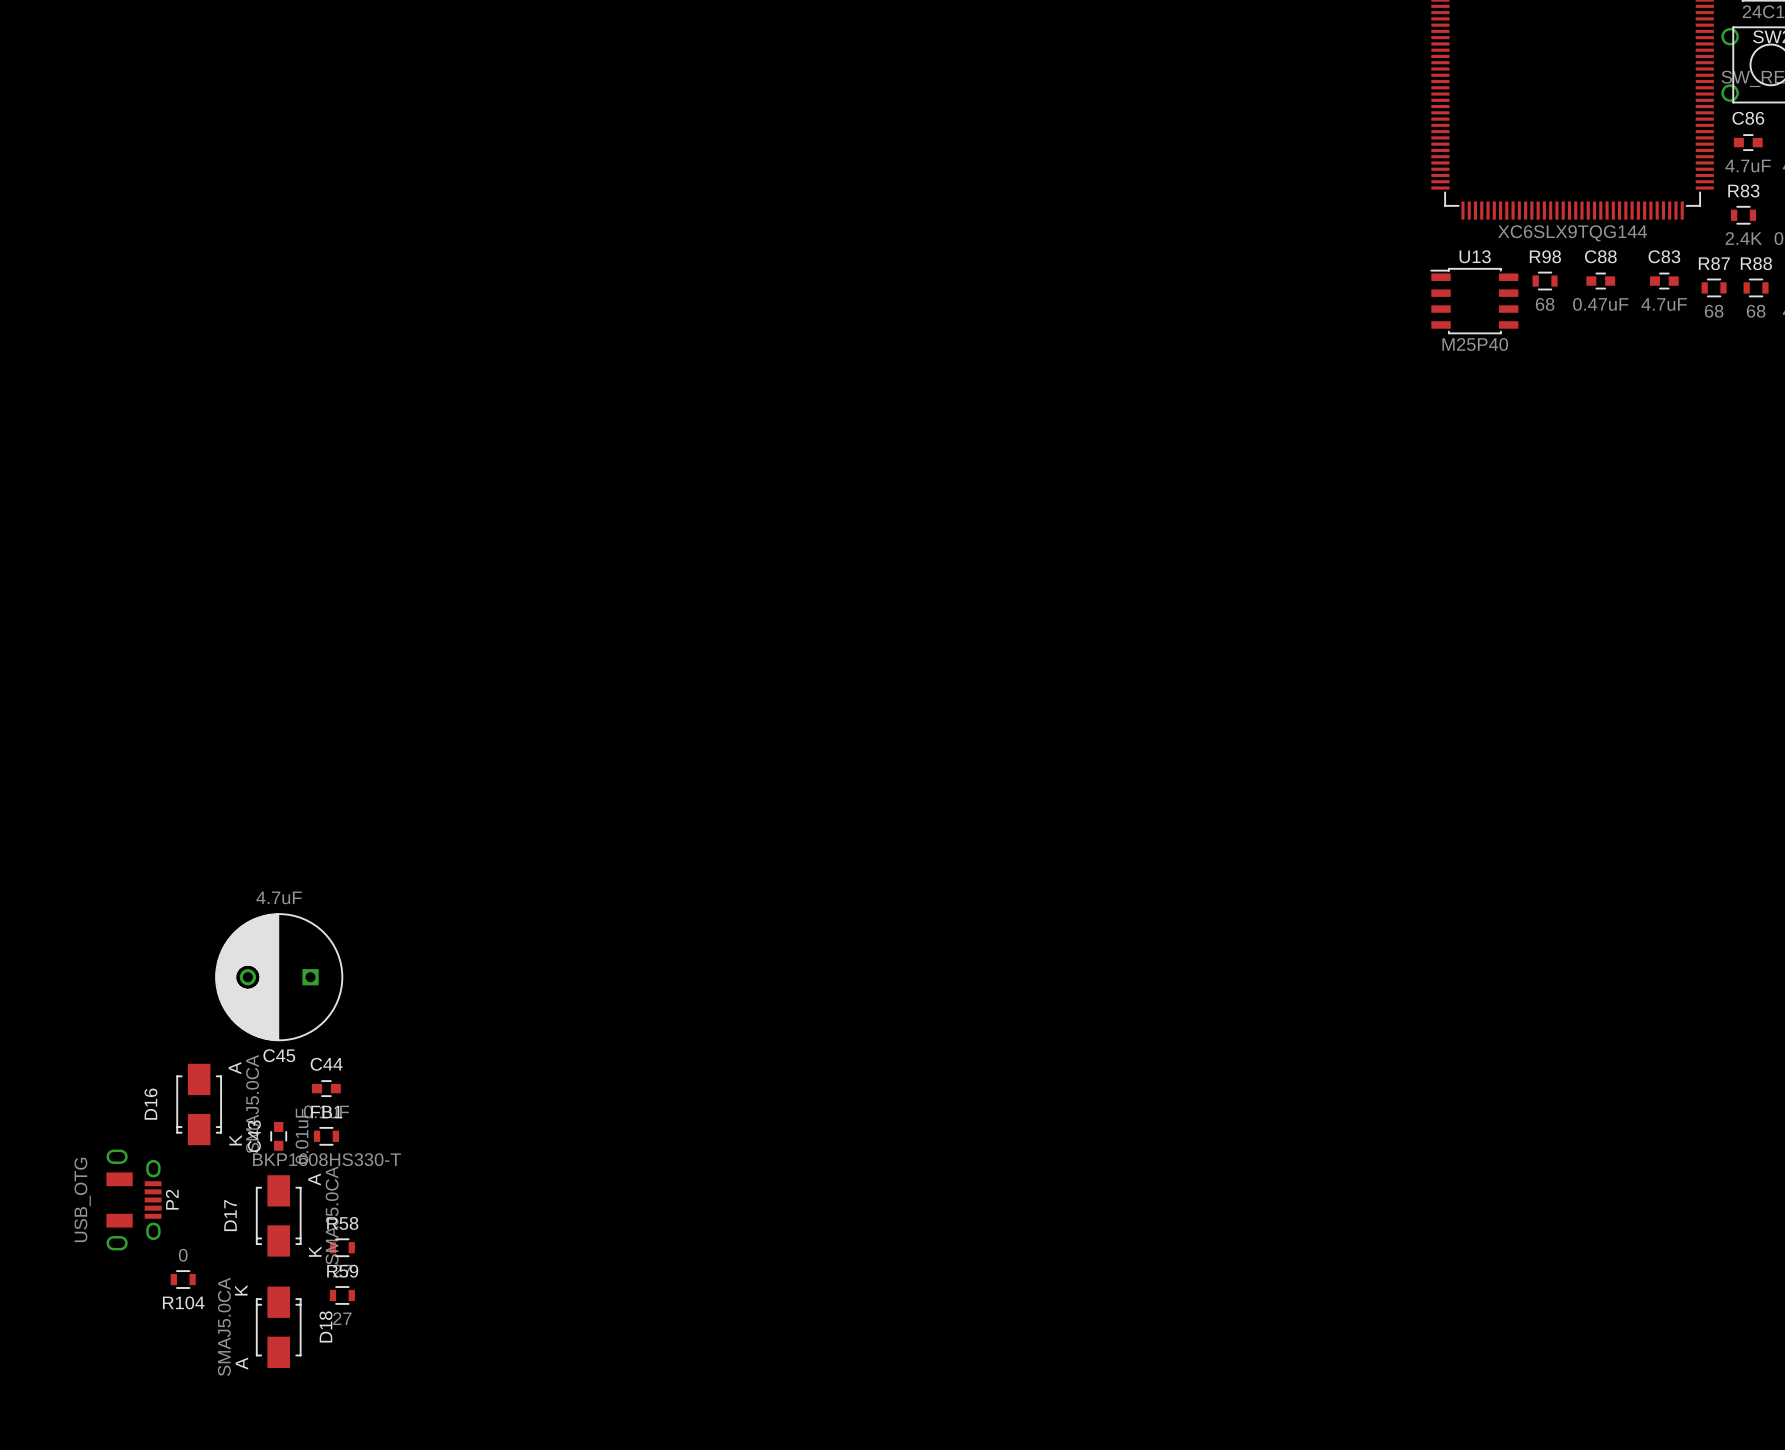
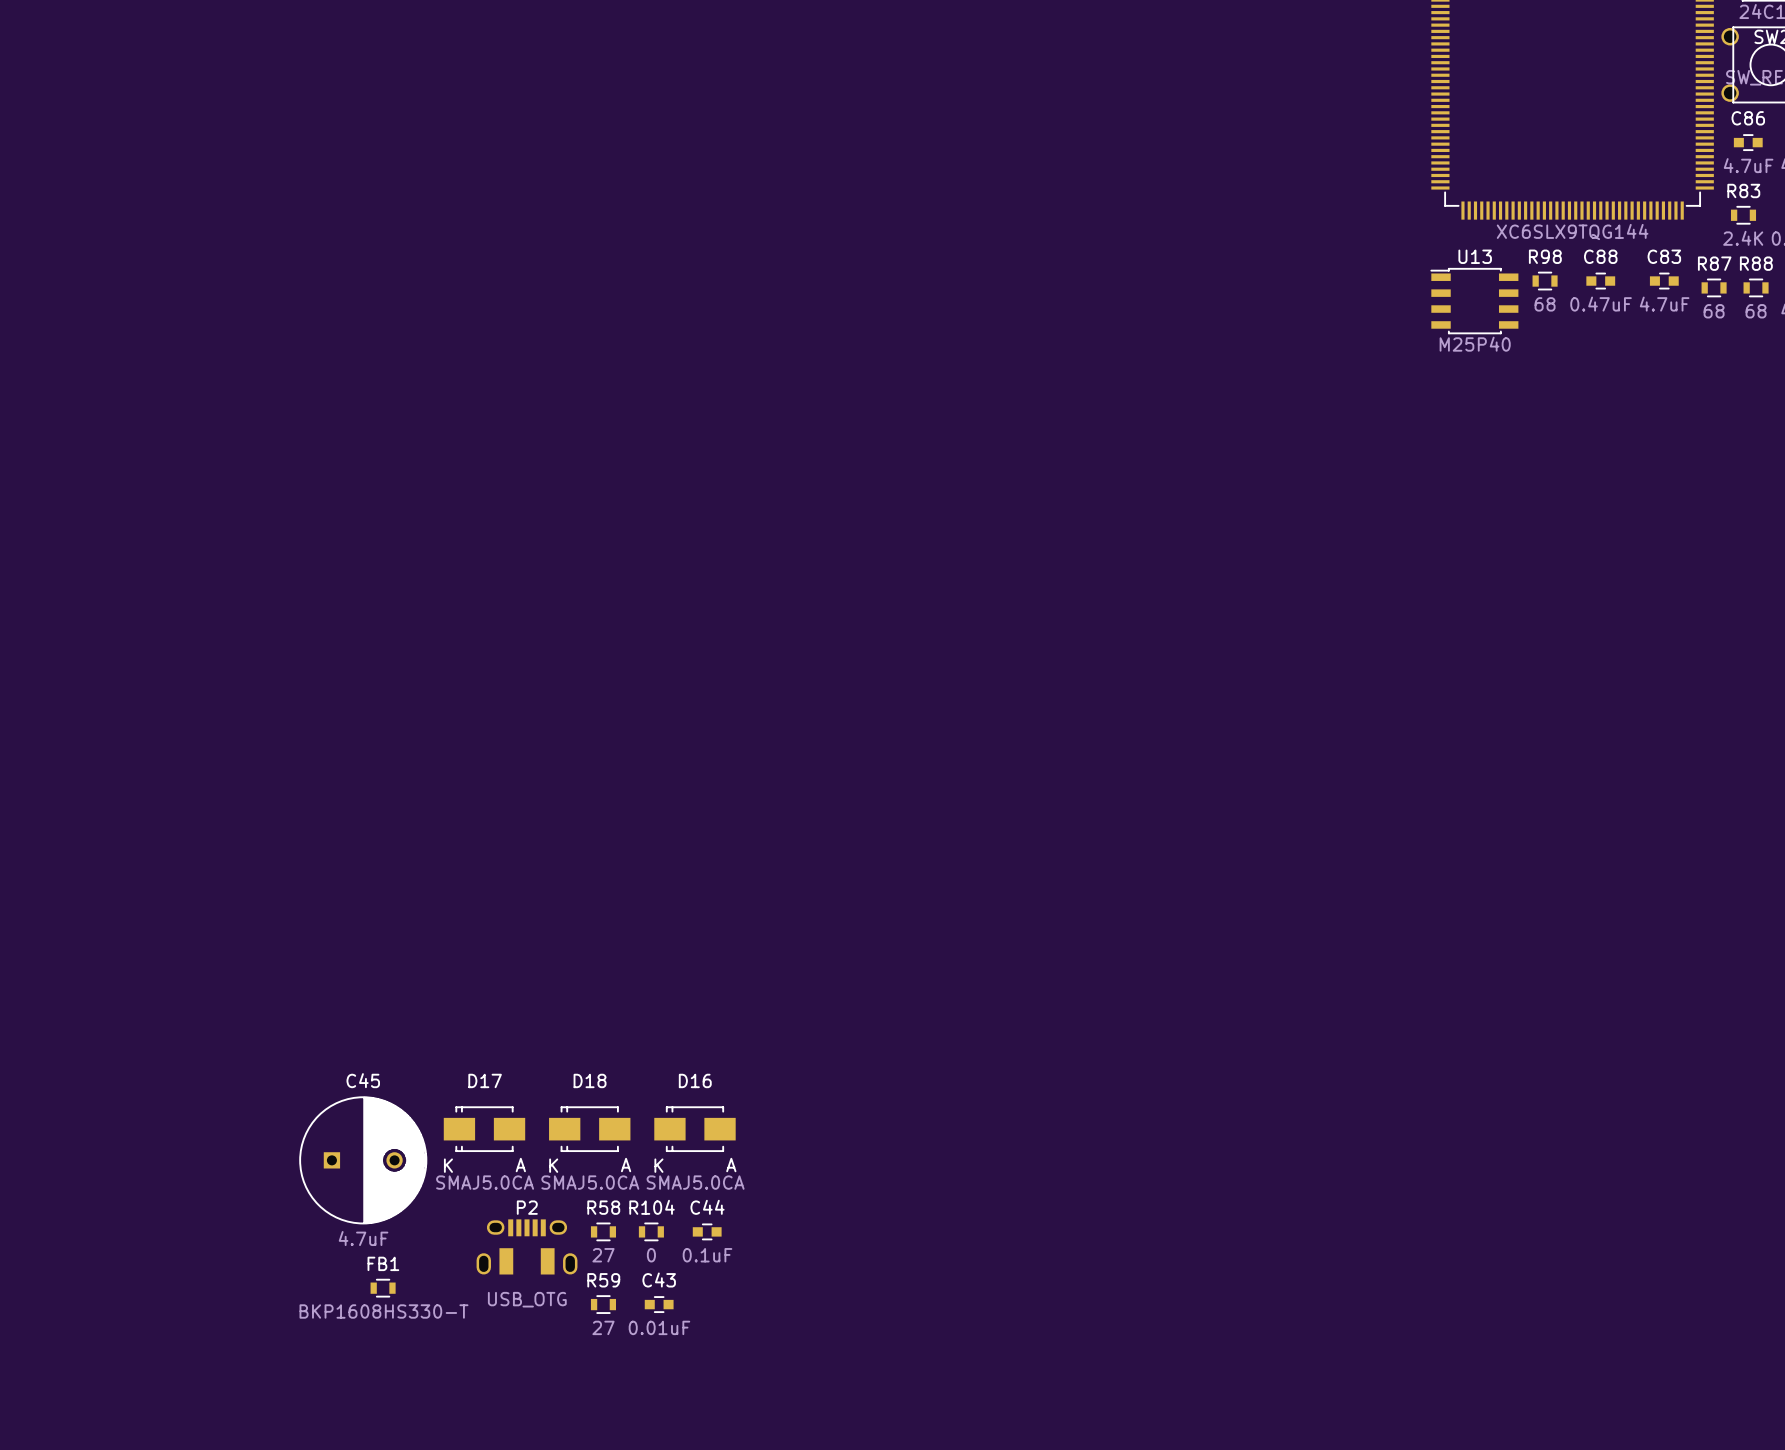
C45 rotation: 0° (279, 977) -> 180° (363, 1160)
C45 position: (279, 977) -> (363, 1160)
C44 position: (326, 1088) -> (707, 1231)
D16 rotation: 0° (199, 1104) -> 90° clockwise (694, 1129)
D16 position: (199, 1104) -> (694, 1129)
C43 rotation: 0° (278, 1136) -> 90° clockwise (659, 1304)
C43 position: (278, 1136) -> (659, 1304)
FB1 position: (326, 1136) -> (383, 1288)
P2 rotation: 0° (133, 1199) -> 90° counterclockwise (527, 1246)
P2 position: (133, 1199) -> (527, 1246)
D17 rotation: 0° (278, 1215) -> 90° clockwise (484, 1129)
D17 position: (278, 1215) -> (484, 1129)
R58 position: (342, 1247) -> (603, 1231)
R104 value position: 0 (183, 1255) -> 0 (651, 1255)
R104 position: (183, 1279) -> (651, 1231)
R59 position: (342, 1295) -> (603, 1304)
R104 name position: R104 (183, 1302) -> R104 (652, 1207)
D18 rotation: 0° (278, 1327) -> 90° counterclockwise (589, 1129)
D18 position: (278, 1327) -> (589, 1129)

